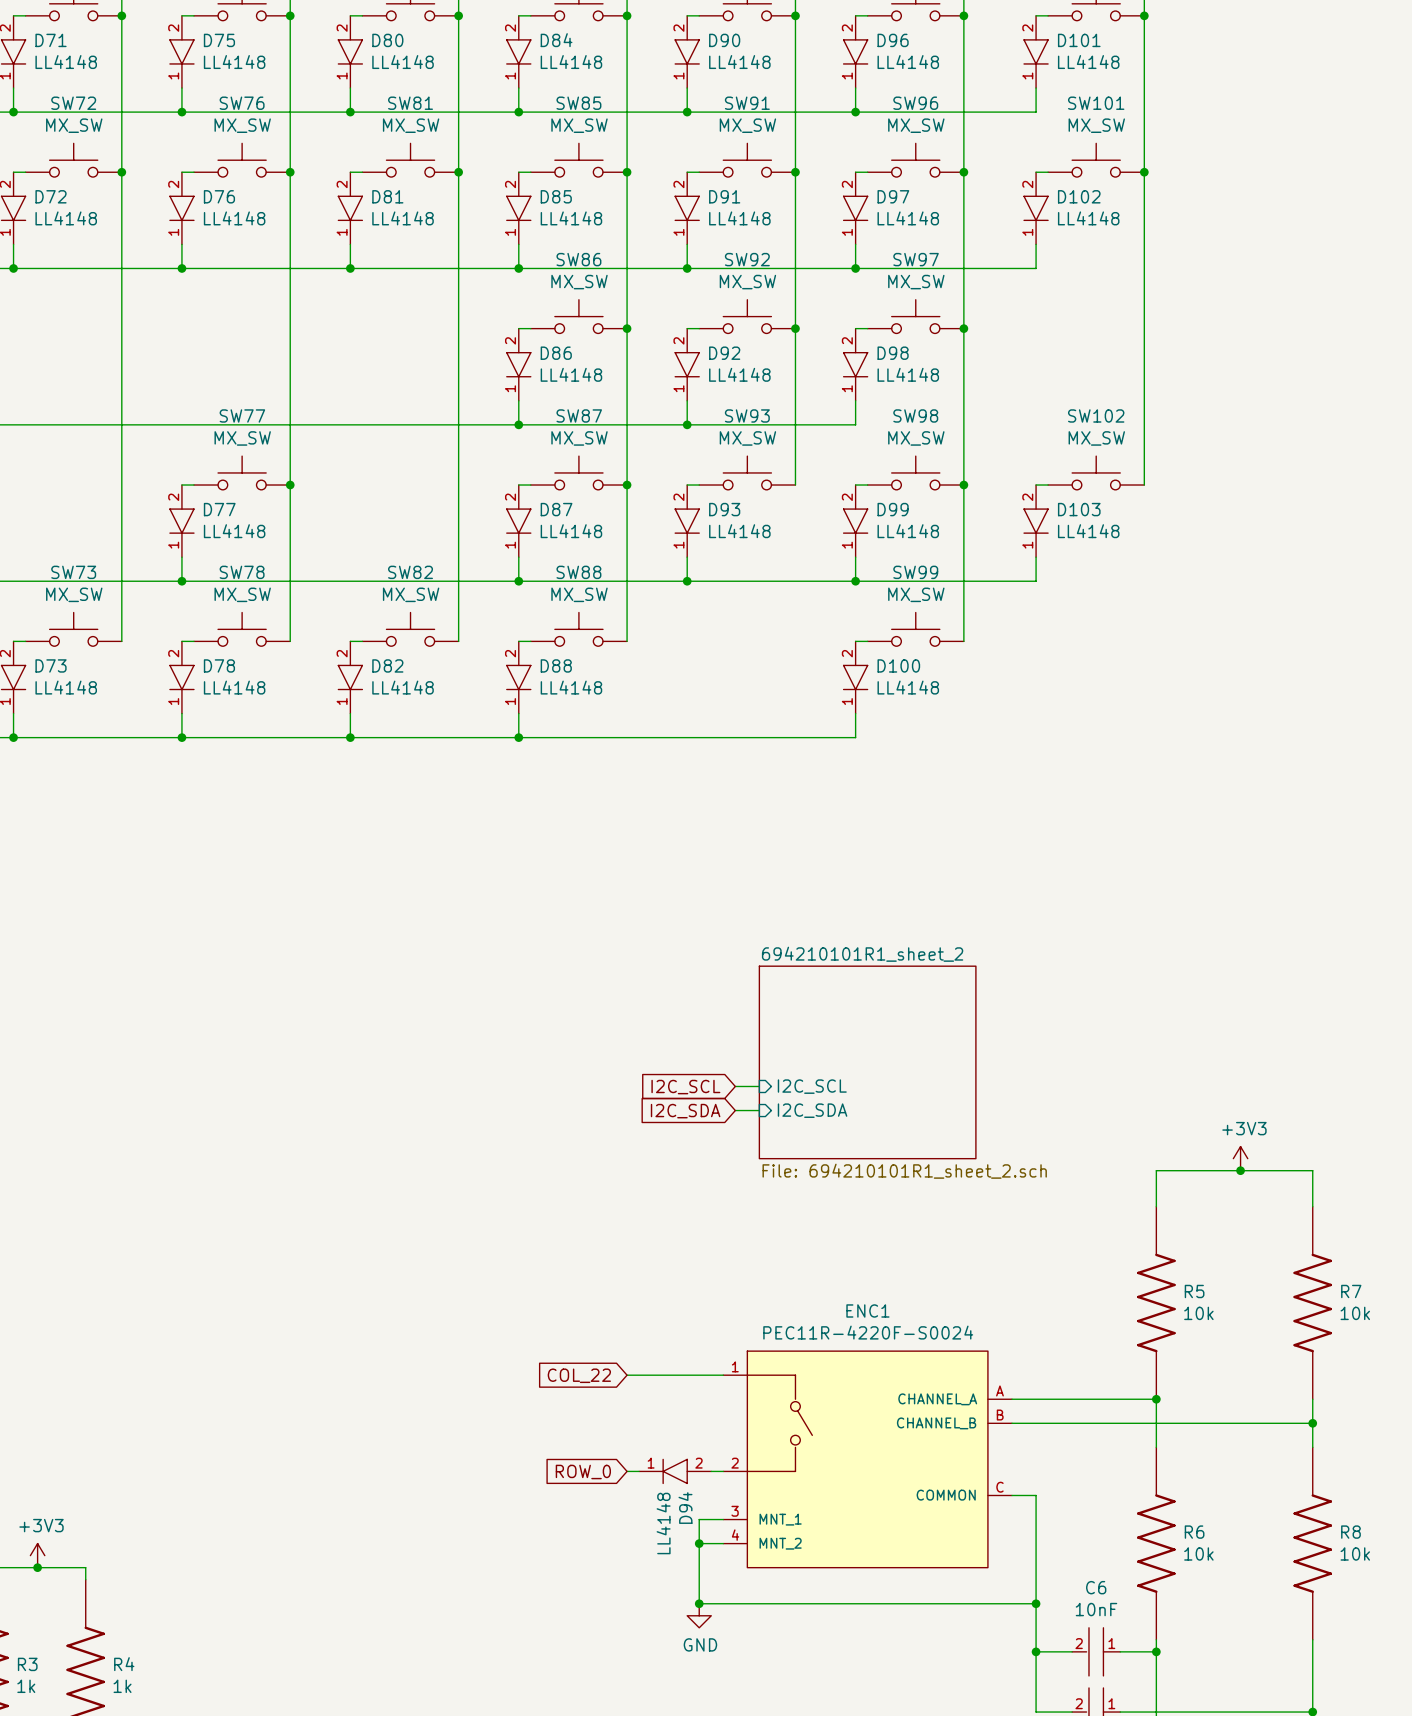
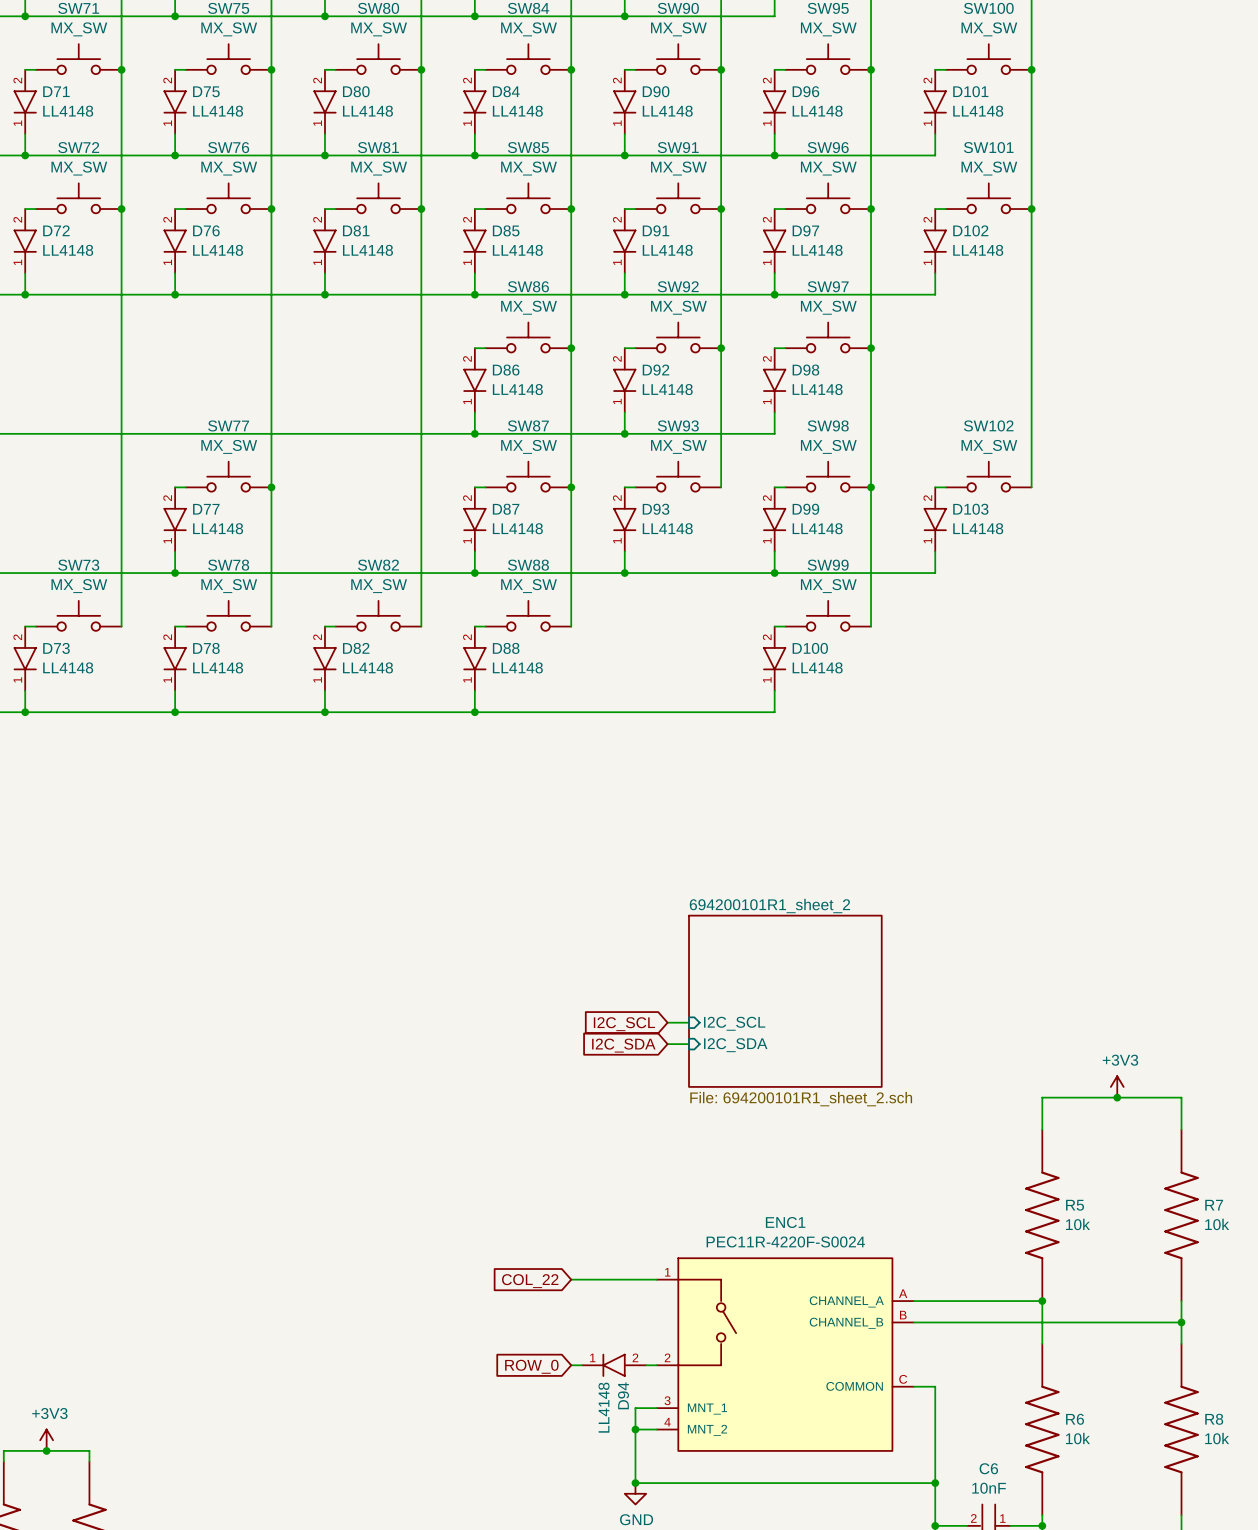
sheet 694210101R1_sheet_2 name: 694210101R1_sheet_2 (862, 954) -> 694200101R1_sheet_2 (769, 906)
sheet 694210101R1_sheet_2 value: File: 694210101R1_sheet_2.sch (904, 1171) -> File: 694200101R1_sheet_2.sch (801, 1099)

